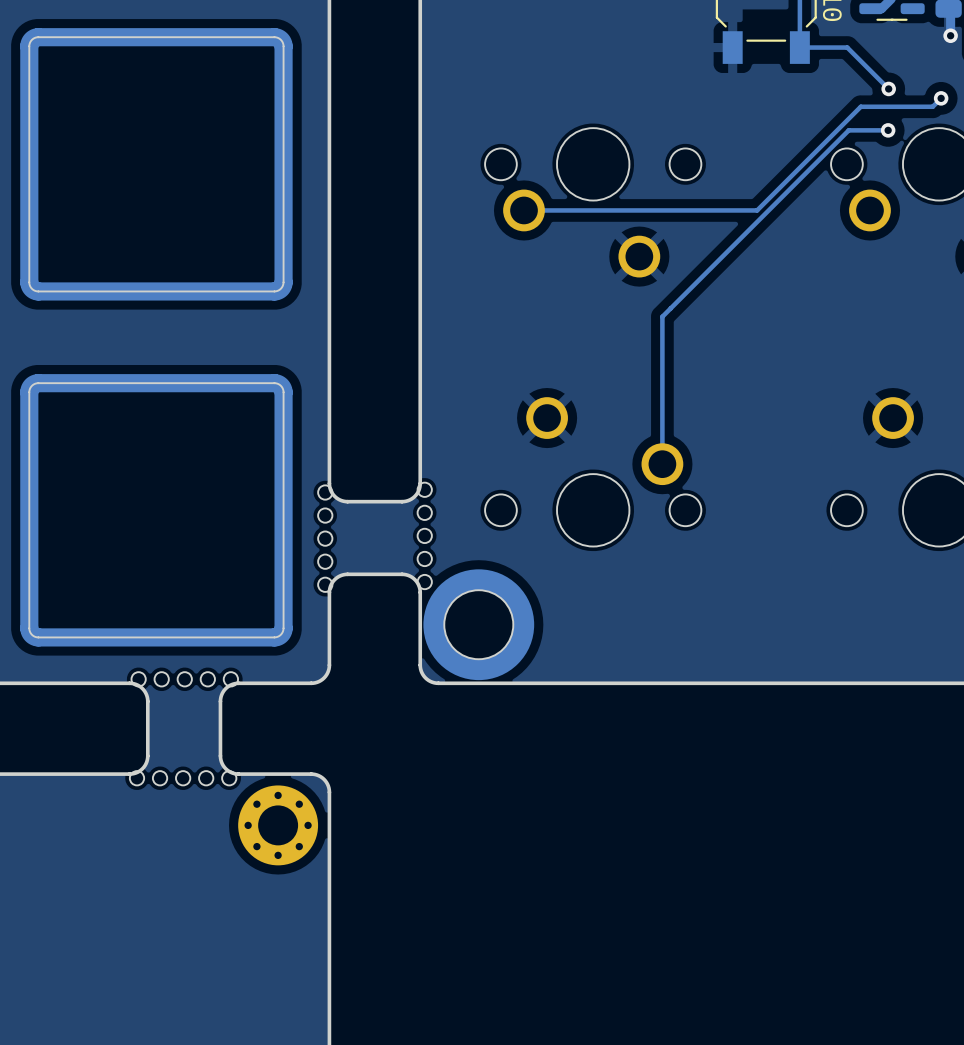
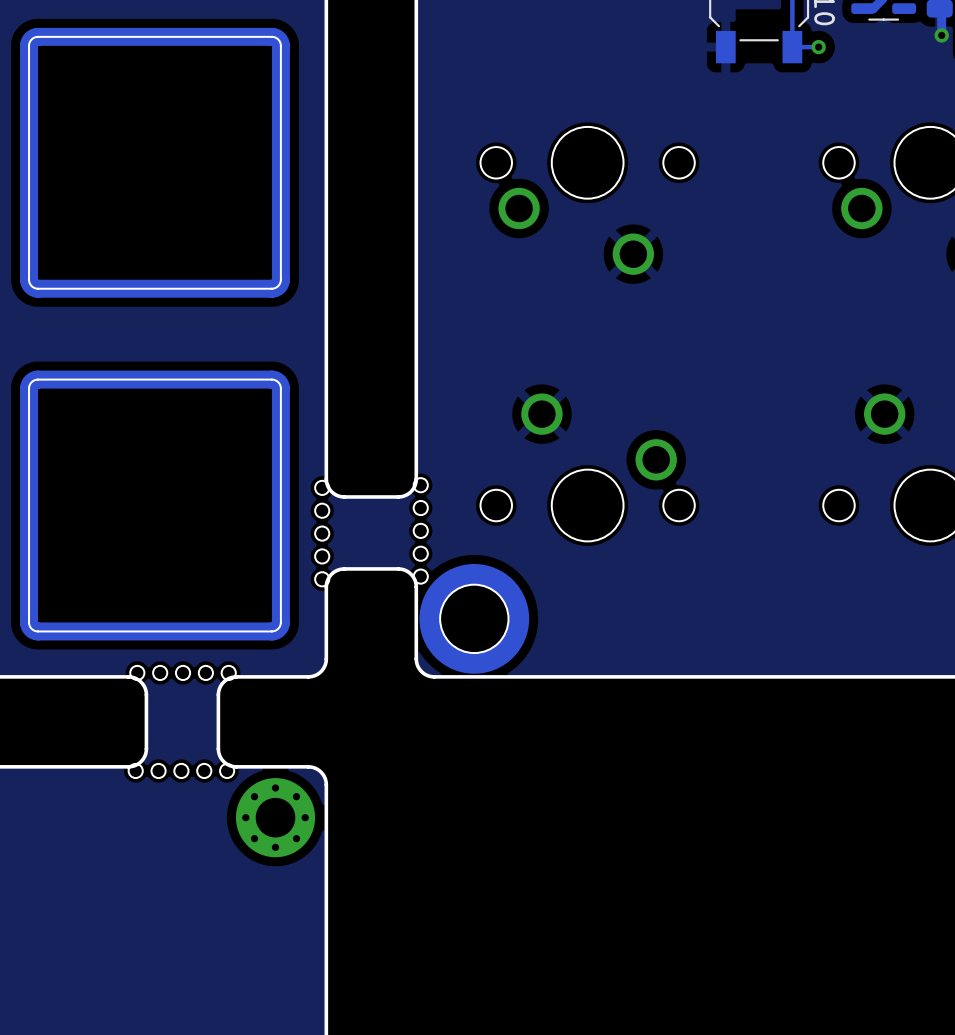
track: (826, 47) (847, 47) (888, 88) -> none
via: none -> (818, 47)
via: (888, 88) -> none
track: (941, 98) (932, 106) (860, 106) (757, 210) (524, 210) -> none
via: (941, 98) -> none
track: (888, 130) (848, 130) (662, 316) (662, 464) -> none
via: (888, 130) -> none

